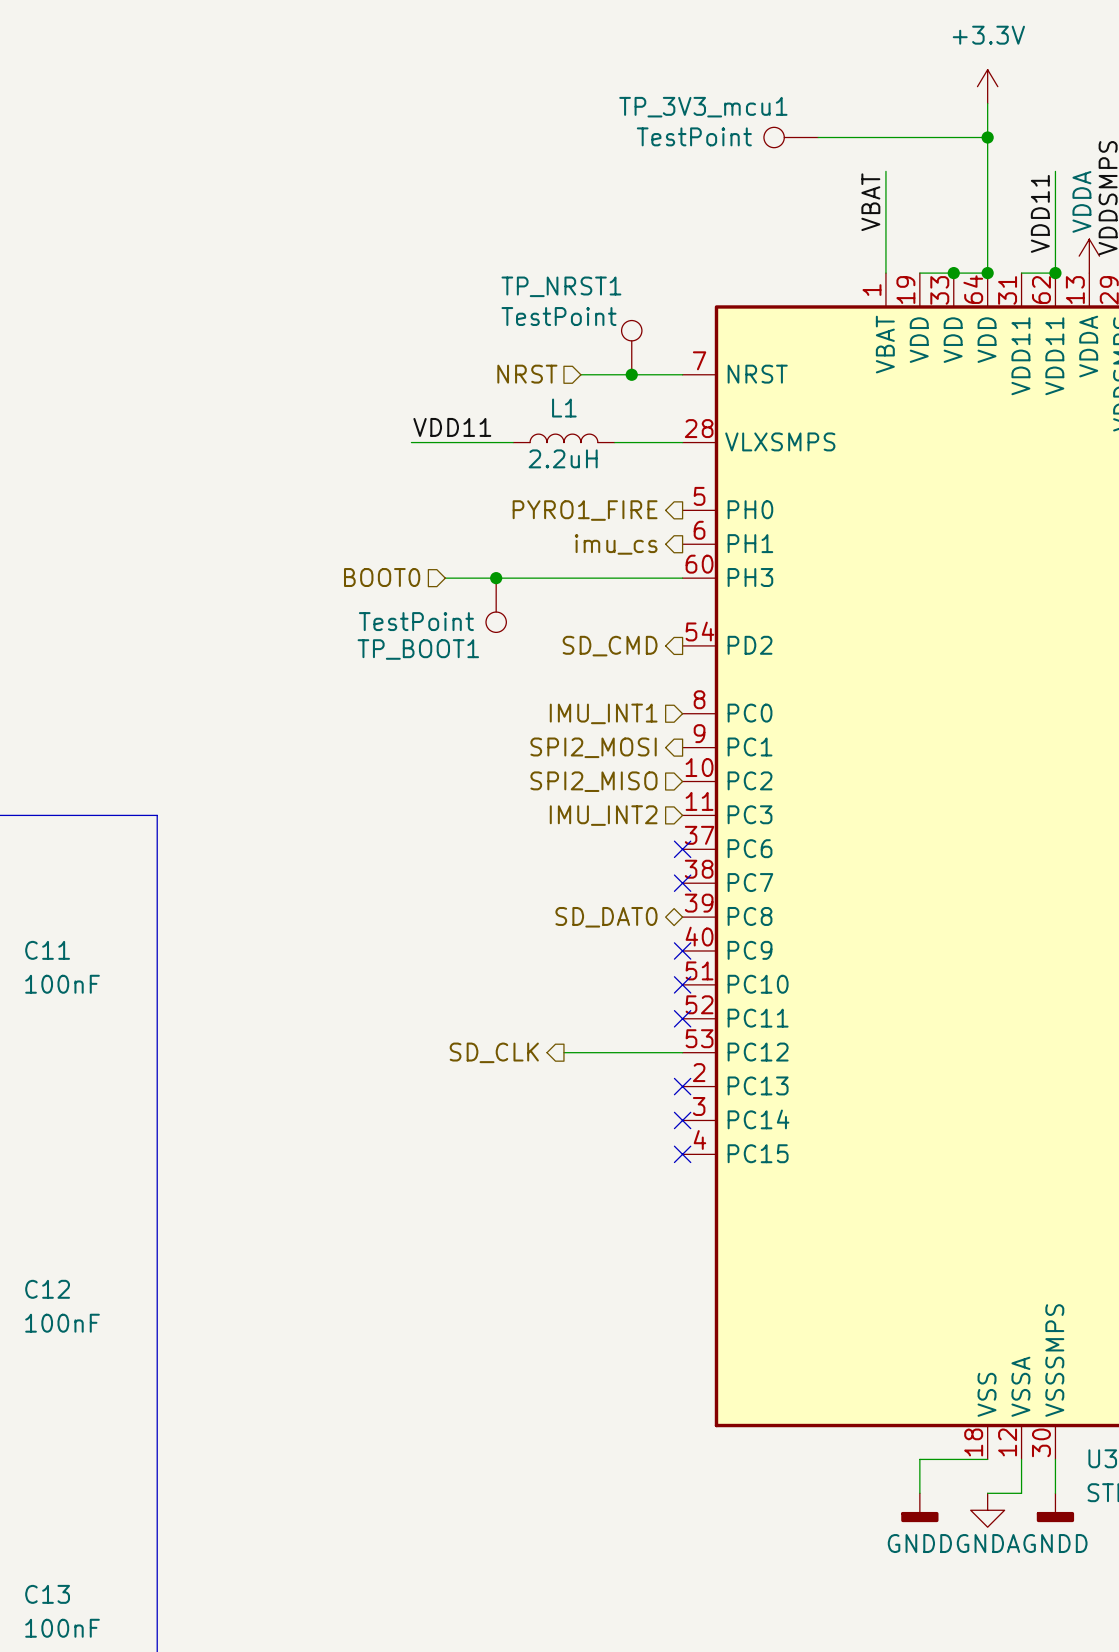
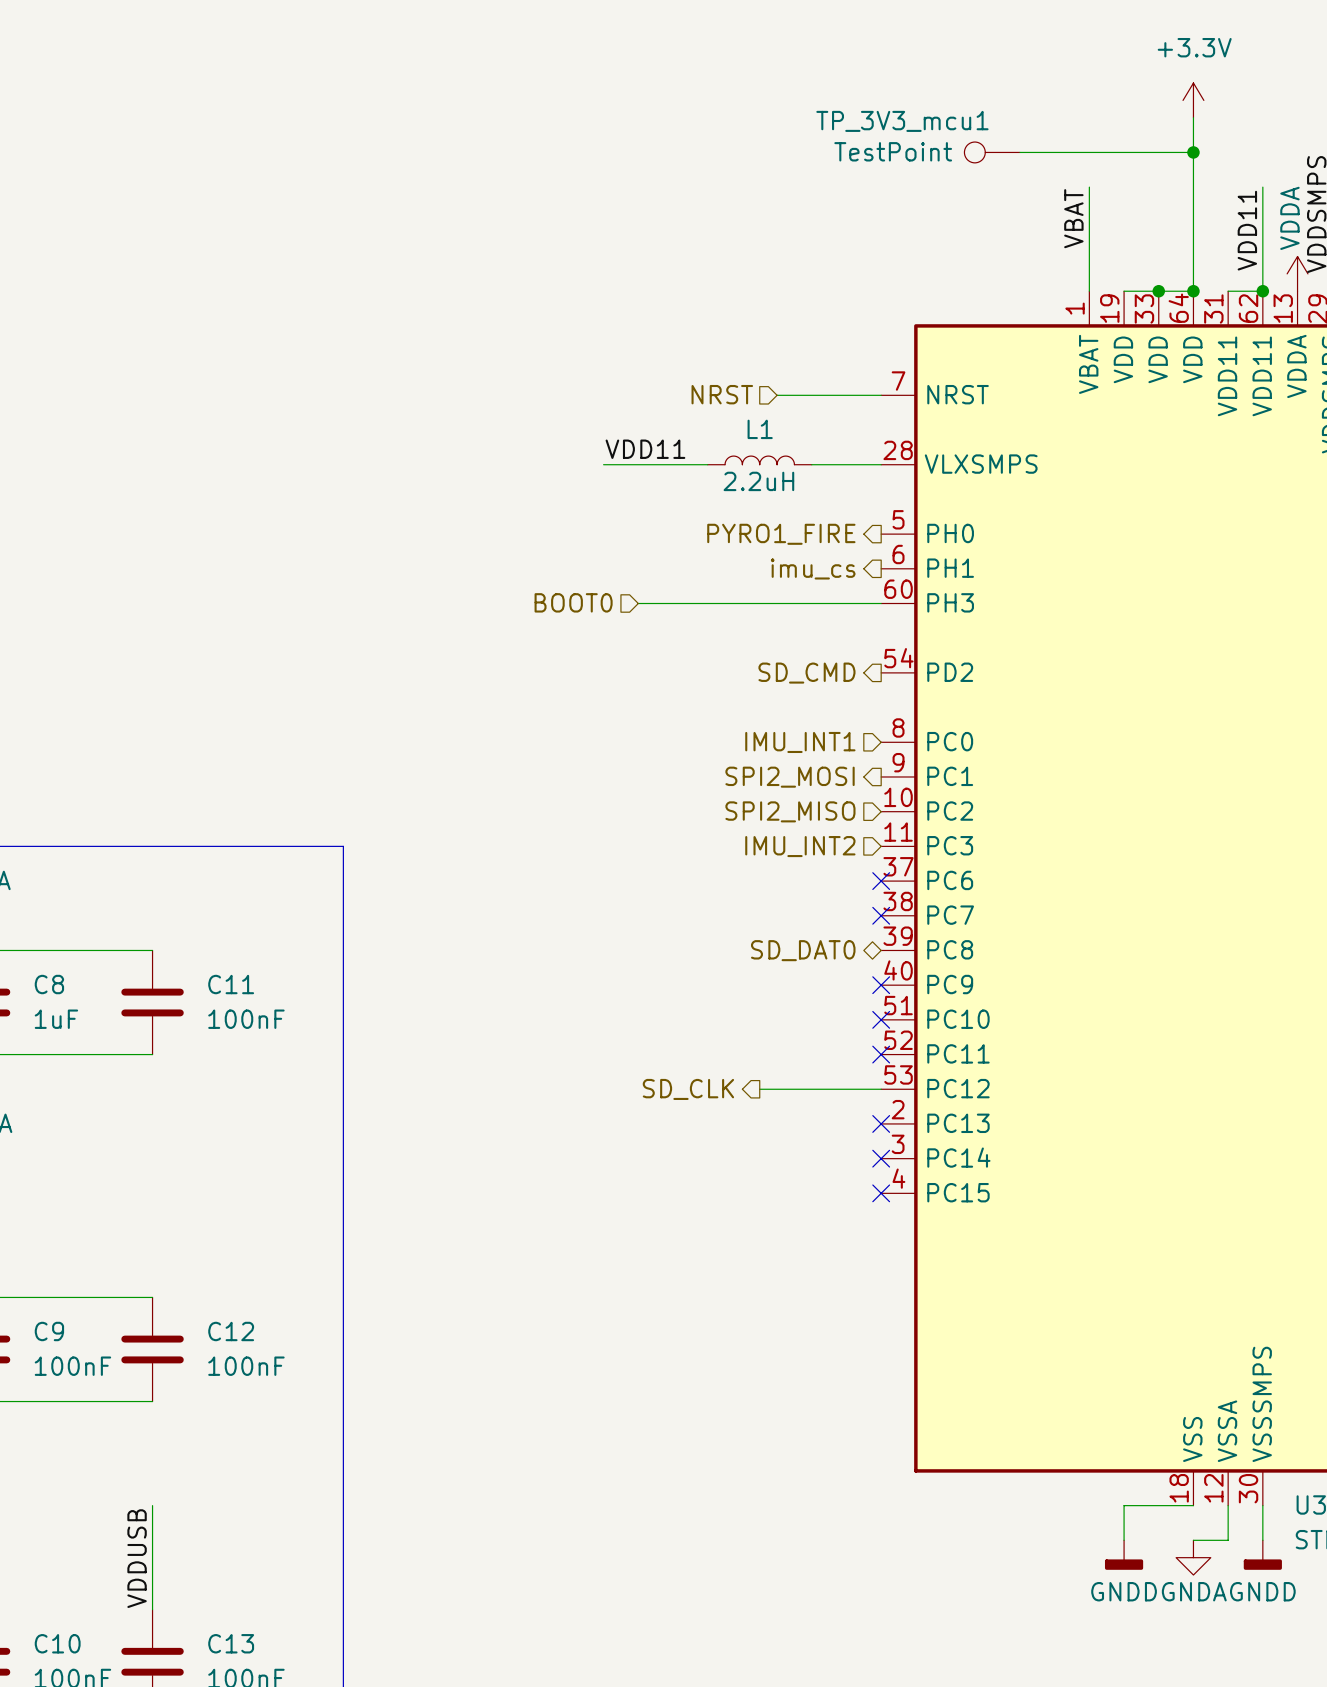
TP_NRST1: TestPoint (631, 347) -> none
junction: (631, 374) -> none
junction: (496, 578) -> none
TP_BOOT1: TestPoint (496, 605) -> none

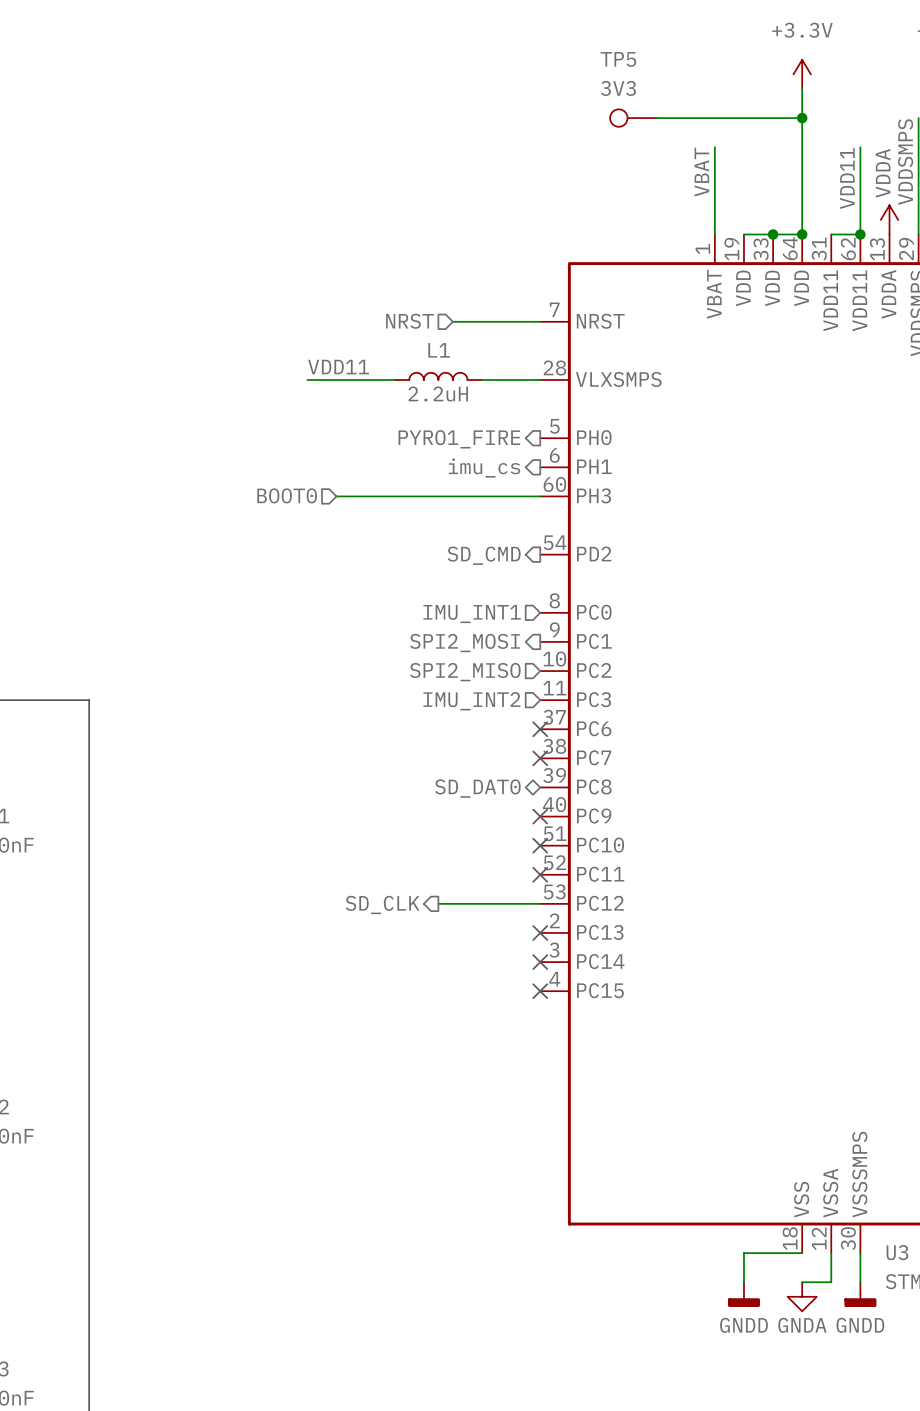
TP_3V3_mcu1 name: TP_3V3_mcu1 (902, 121) -> TP5 (618, 59)
TP_3V3_mcu1 value: TestPoint (893, 151) -> 3V3 (618, 88)

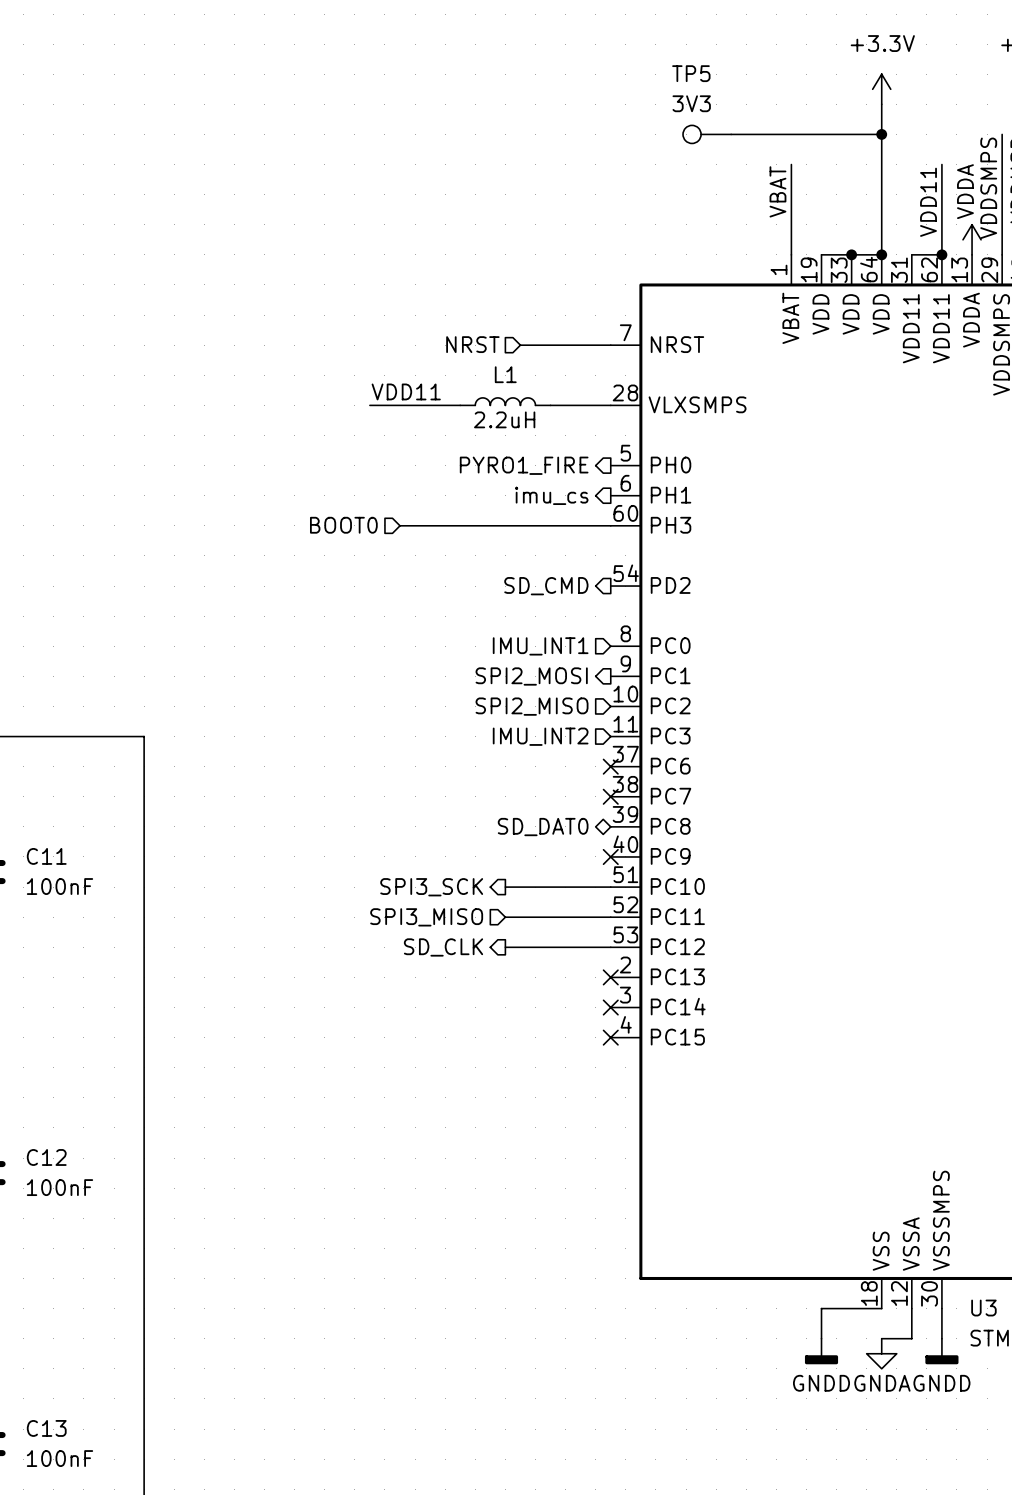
wire: none -> (505, 887) (610, 887)
no-connect mark: (540, 845) -> none
hierarchical label: none -> SPI3_SCK (431, 887)
wire: none -> (505, 917) (610, 917)
no-connect mark: (540, 874) -> none
hierarchical label: none -> SPI3_MISO (426, 917)

